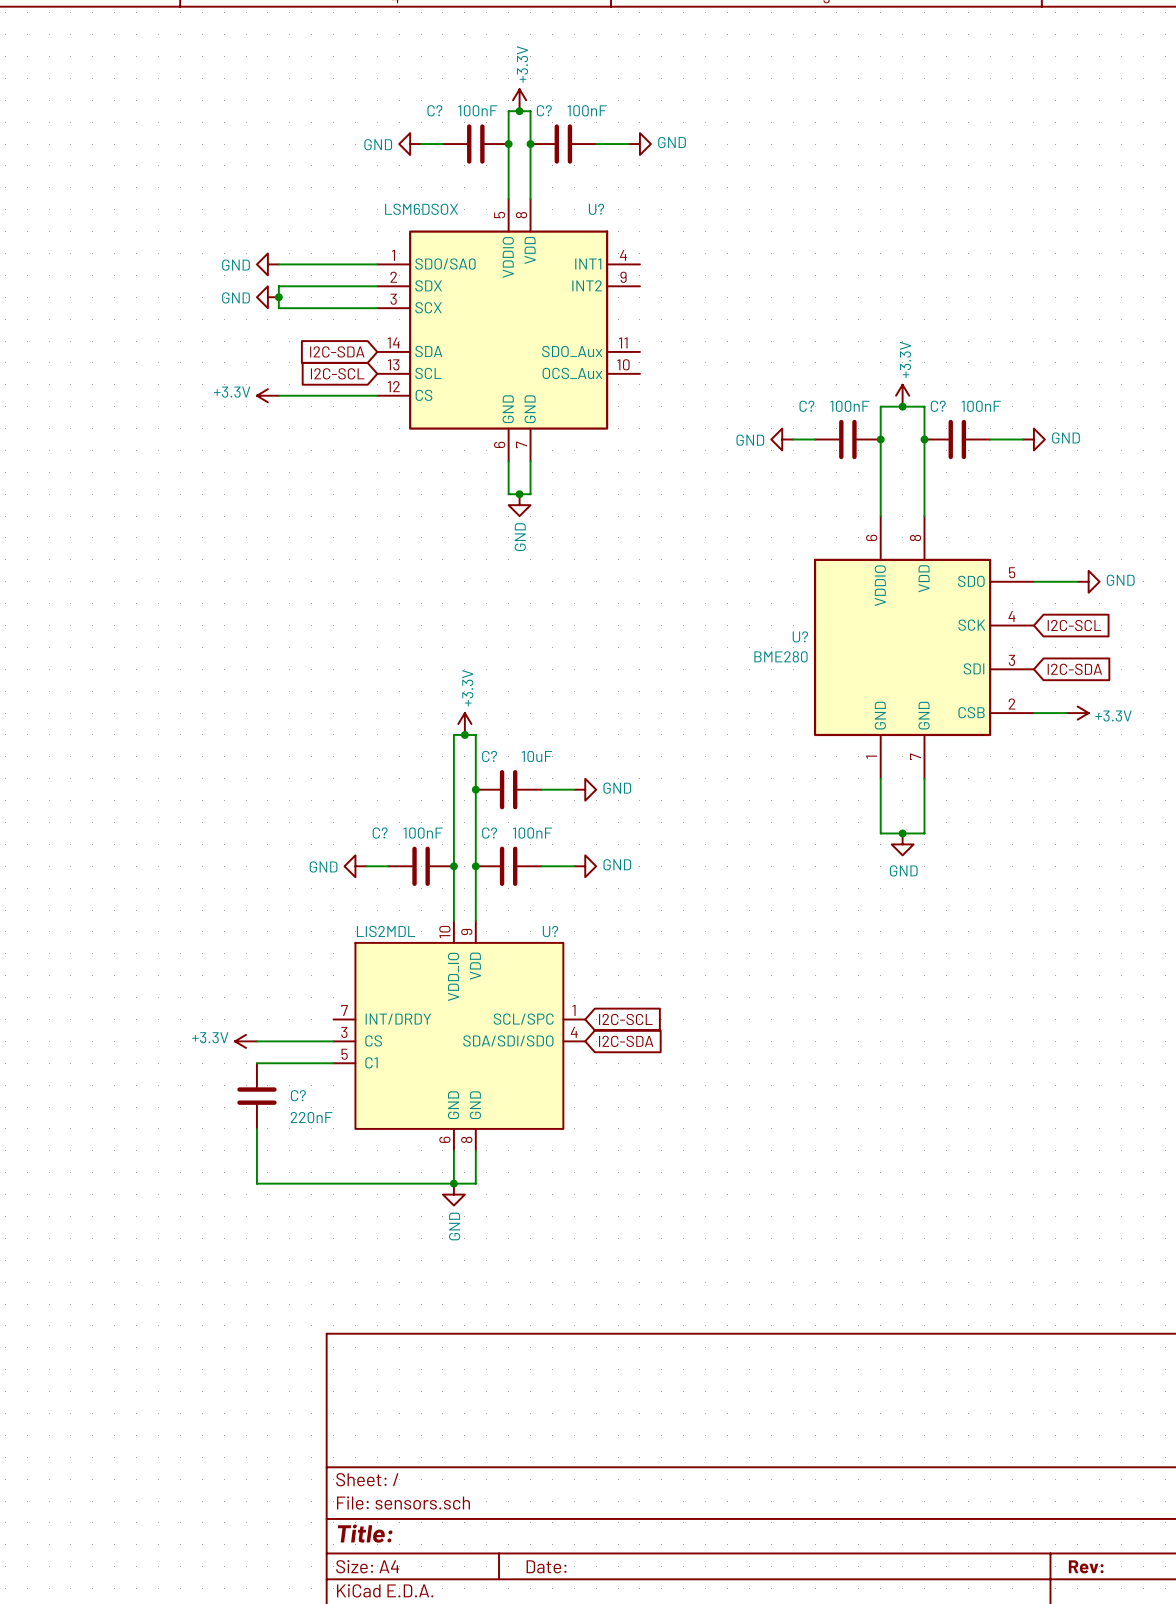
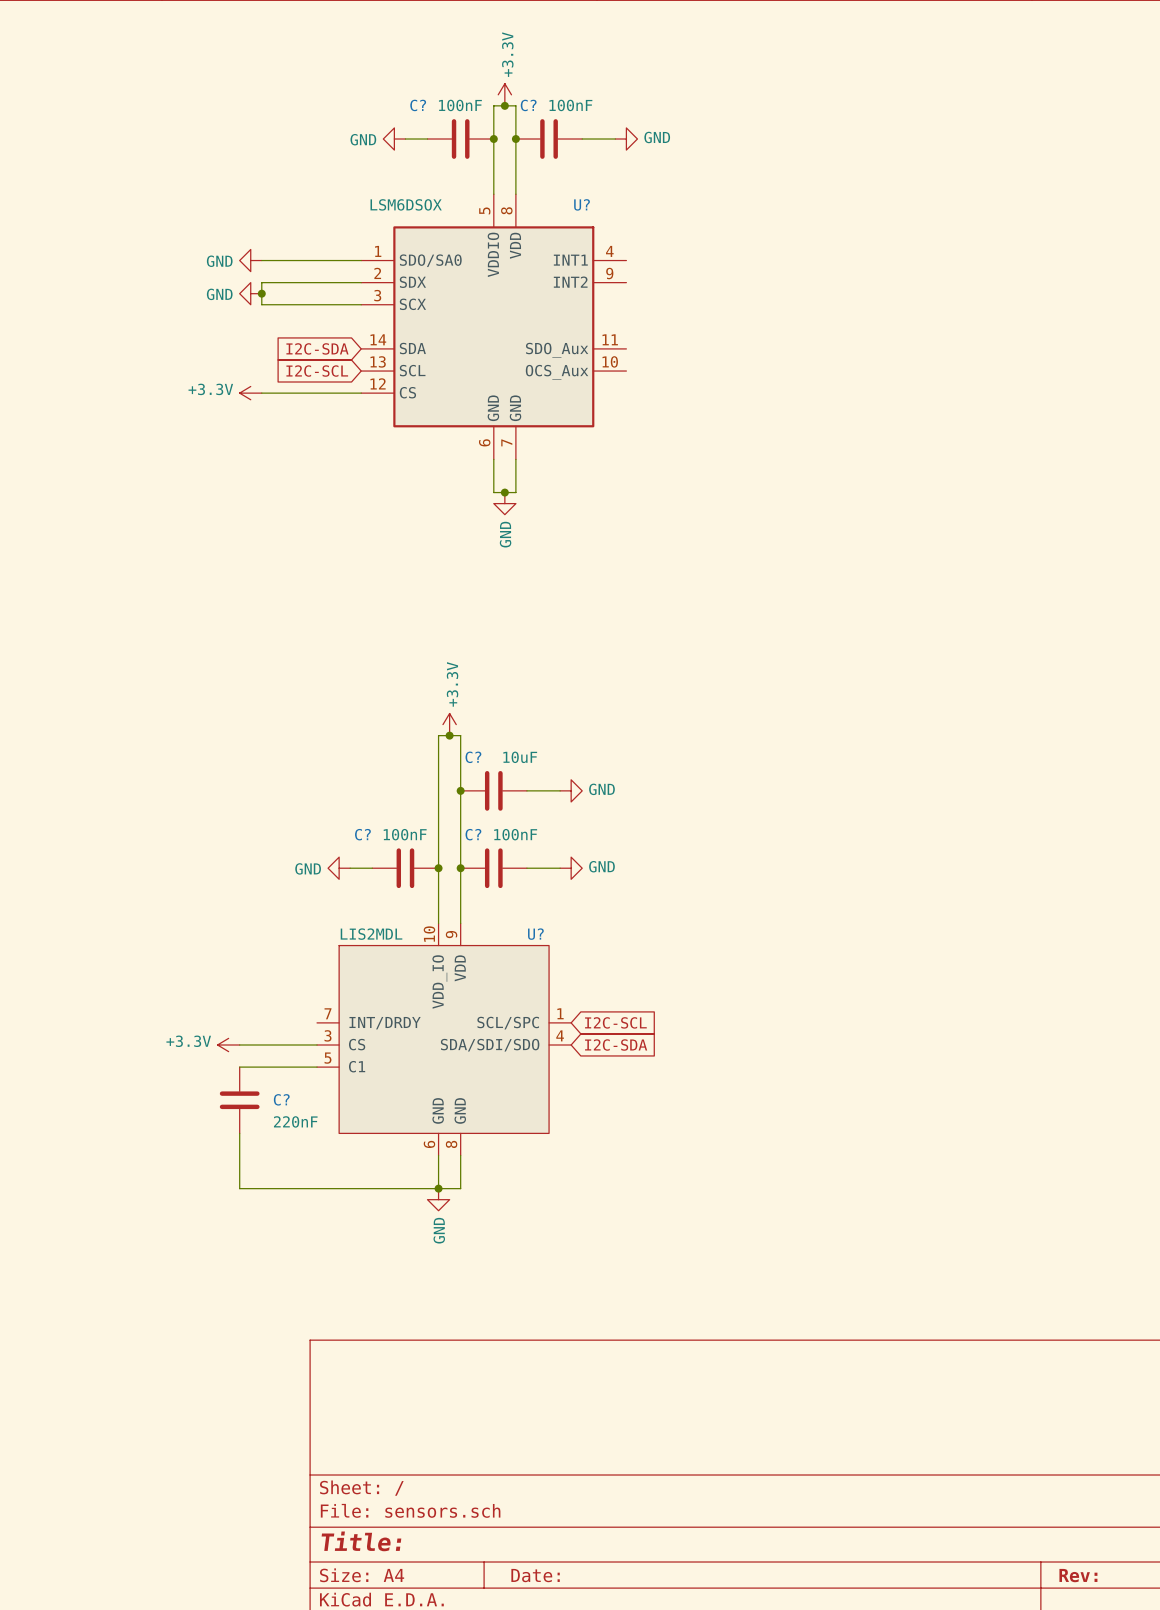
power symbol: +3.3V (902, 395) -> none
junction: (902, 406) -> none
power symbol: GND (782, 439) -> none
wire: (793, 439) (815, 439) -> none
C?: 100nF (847, 439) -> none
junction: (880, 439) -> none
junction: (924, 439) -> none
C?: 100nF (957, 439) -> none
wire: (990, 439) (1022, 439) -> none
power symbol: GND (1033, 439) -> none
wire: (880, 516) (880, 406) (924, 406) (924, 516) -> none
wire: (1033, 581) (1077, 581) -> none
power symbol: GND (1088, 581) -> none
global label: I2C-SCL (1074, 625) -> none
U?: BME280 (923, 647) -> none
global label: I2C-SDA (1074, 669) -> none
wire: (1033, 713) (1066, 713) -> none
power symbol: +3.3V (1077, 713) -> none
wire: (880, 778) (880, 833) (924, 833) (924, 778) -> none
junction: (902, 833) -> none
power symbol: GND (902, 844) -> none

